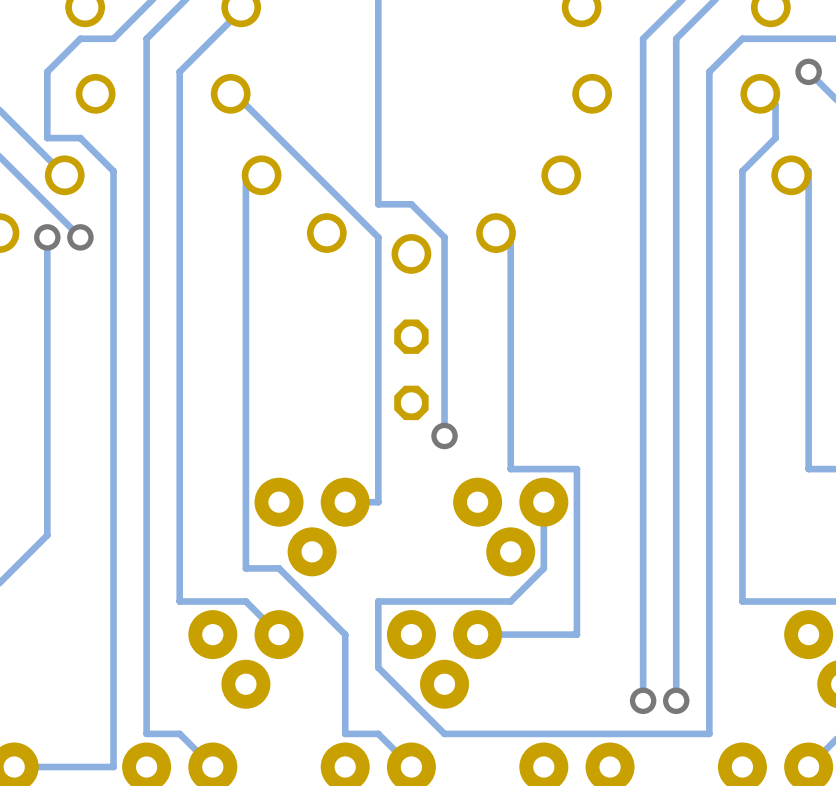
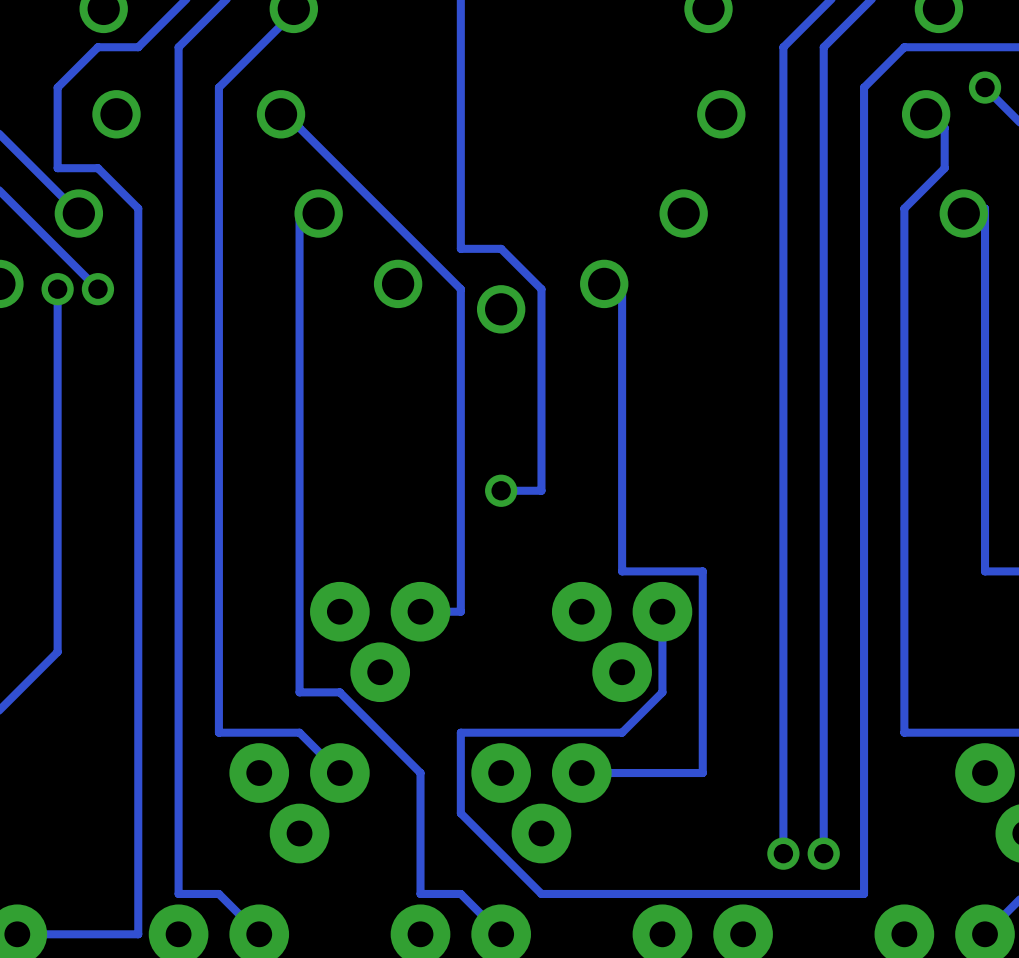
part: (411, 369) -> none
track: (444, 402) (444, 435) -> (541, 490) (501, 490)
via position: (444, 435) -> (501, 490)

